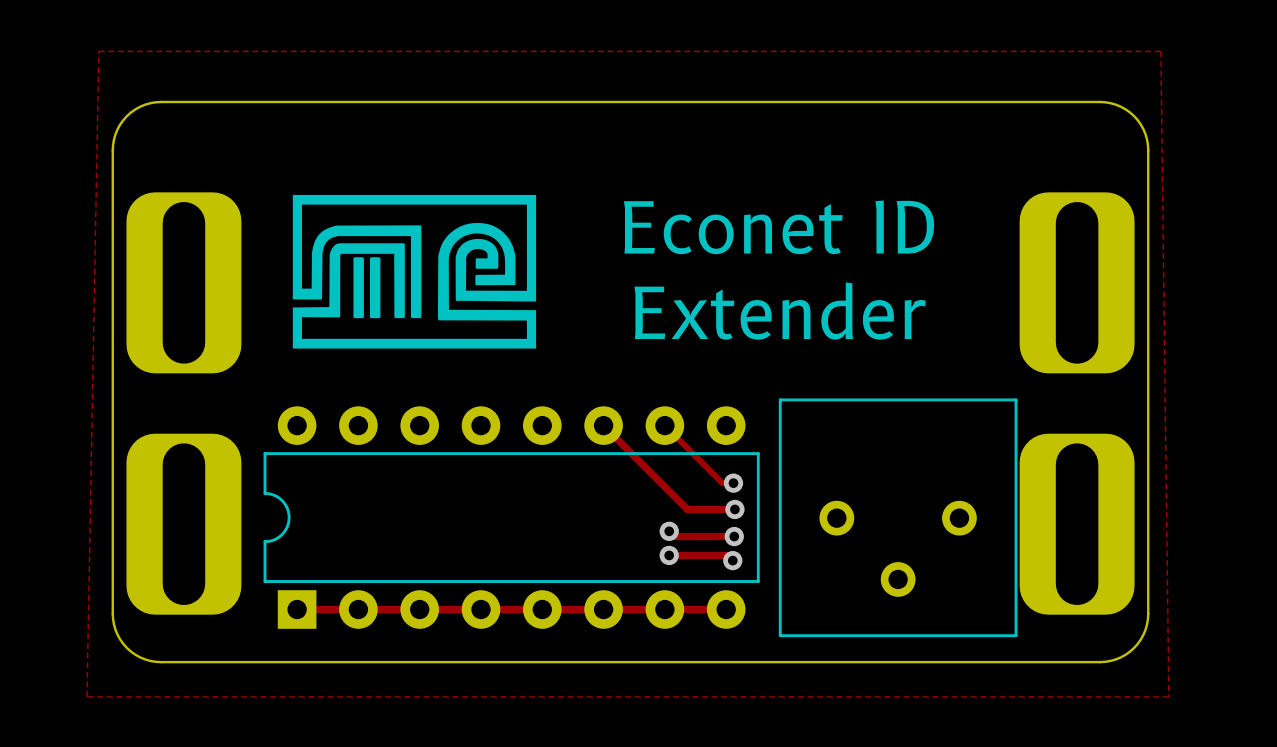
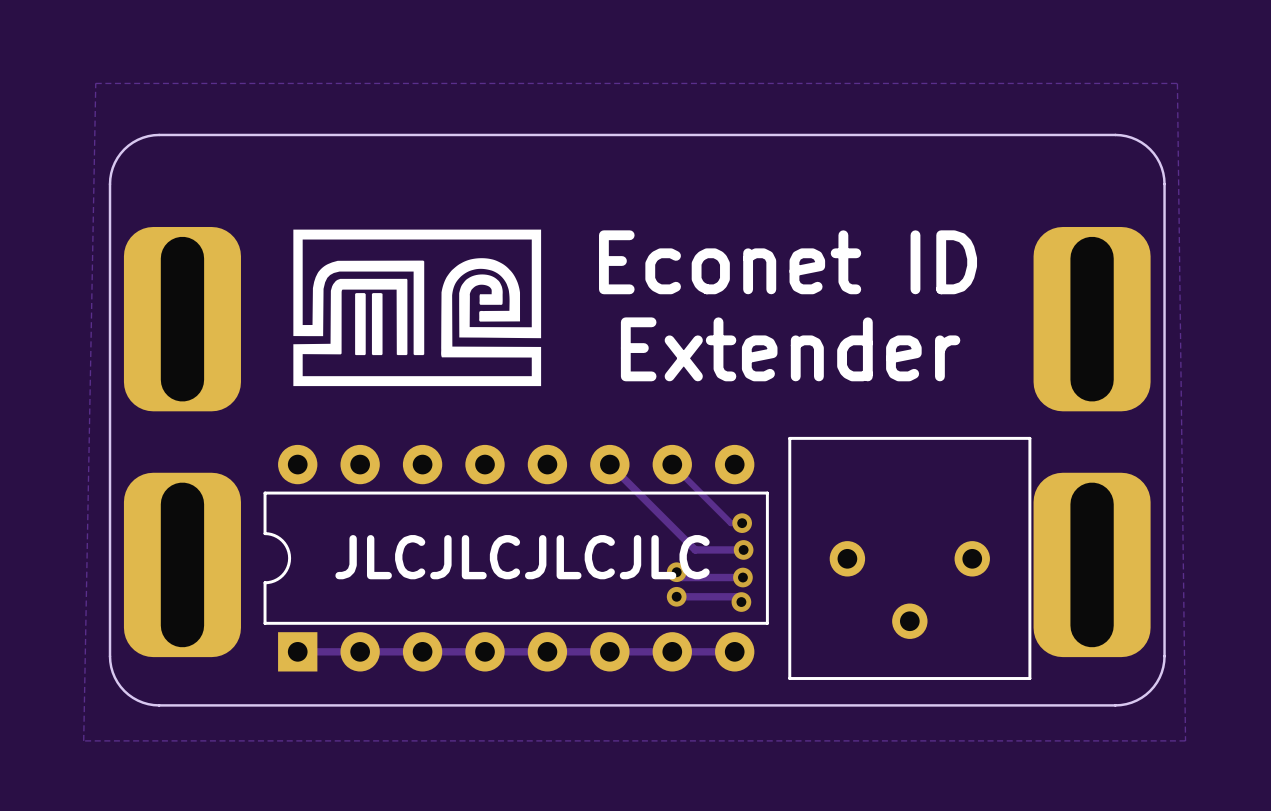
text: none -> JLCJLCJLCJLC (522, 557)

